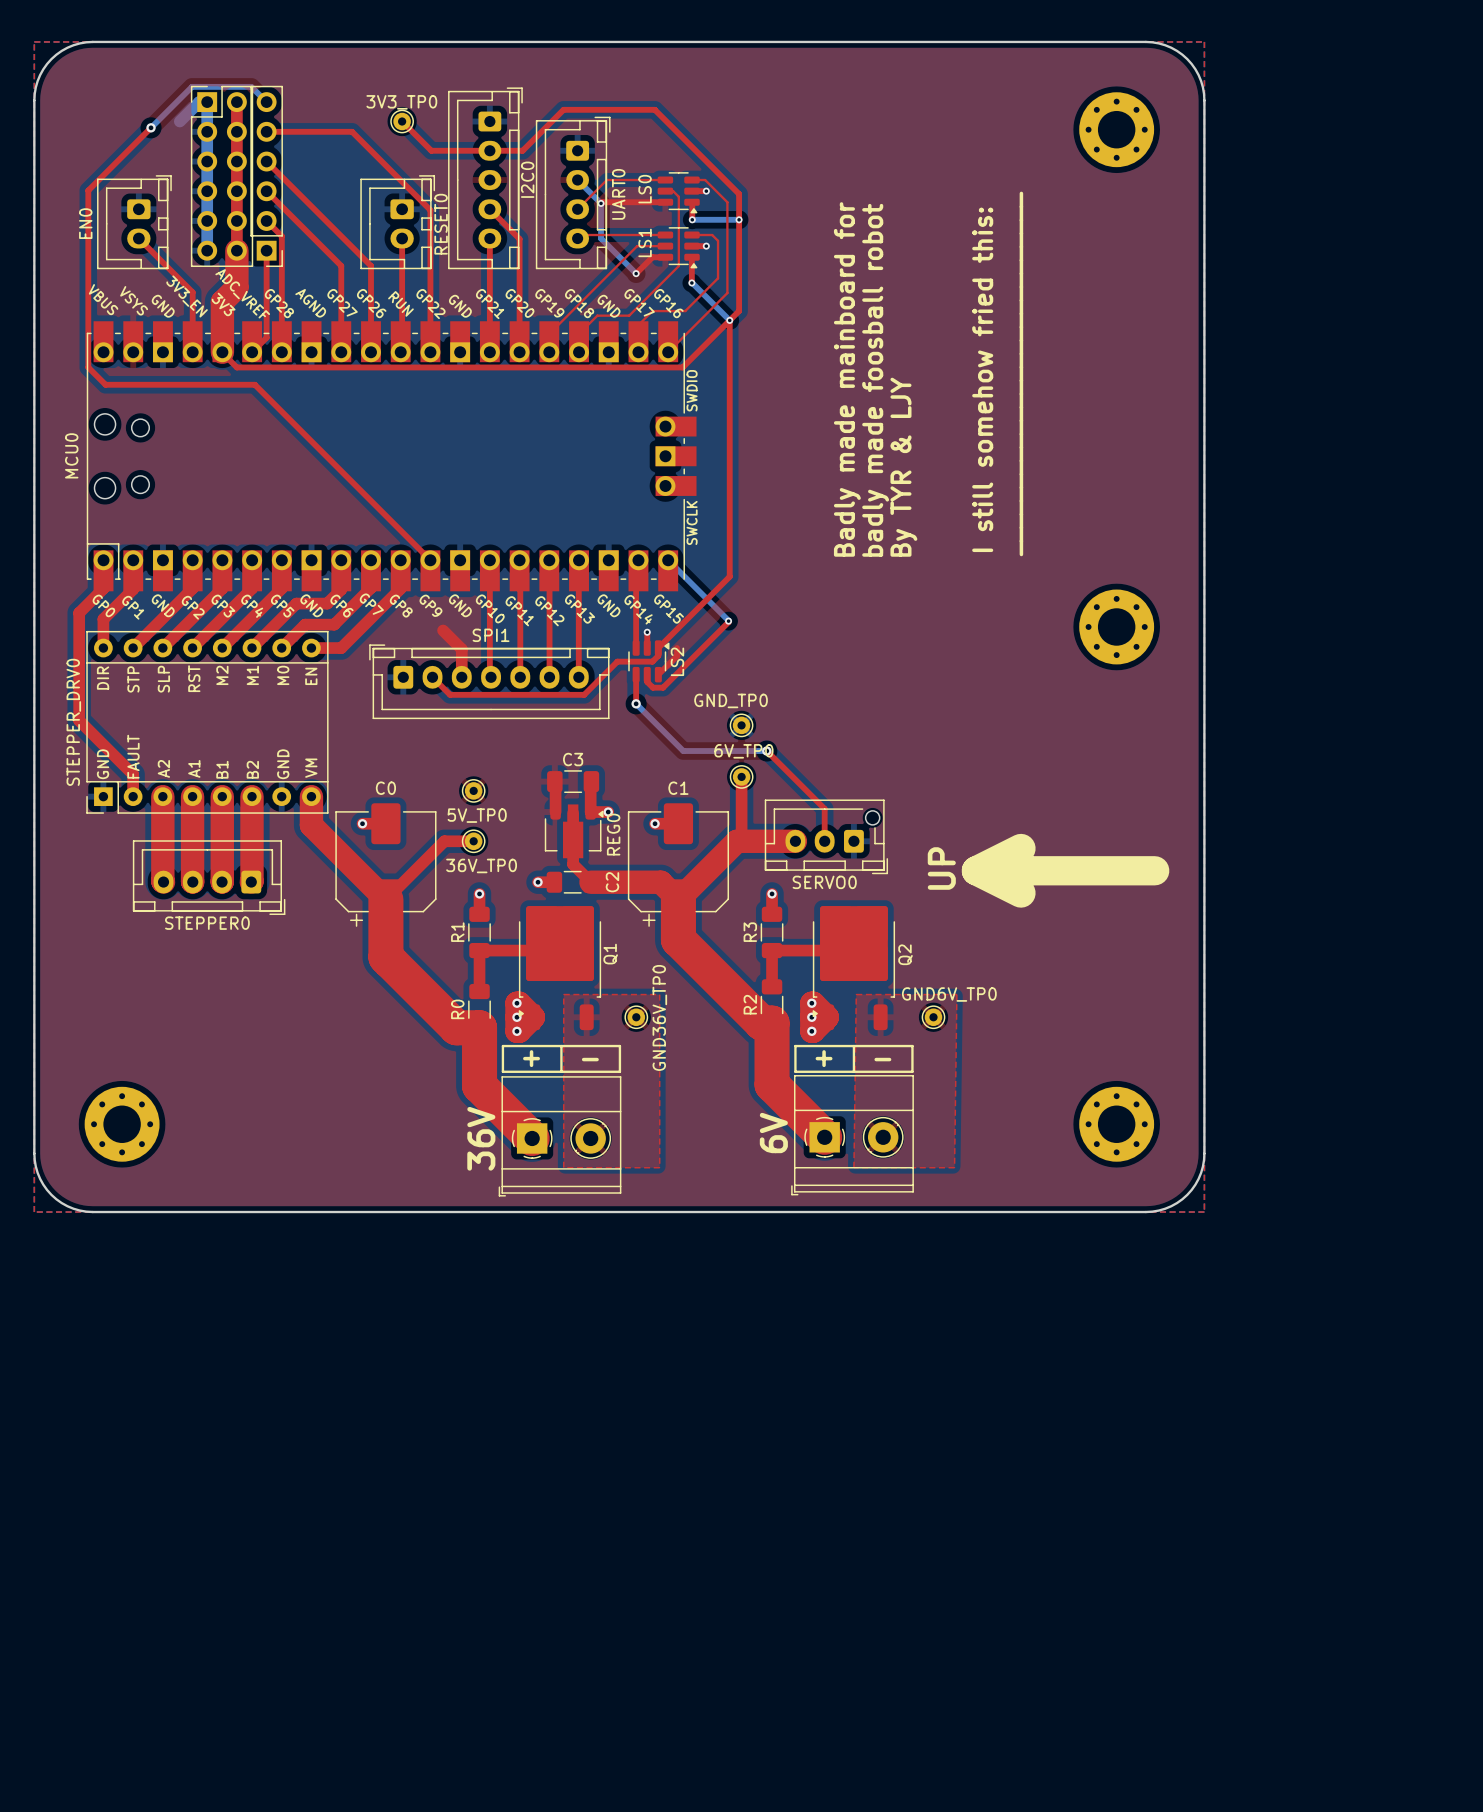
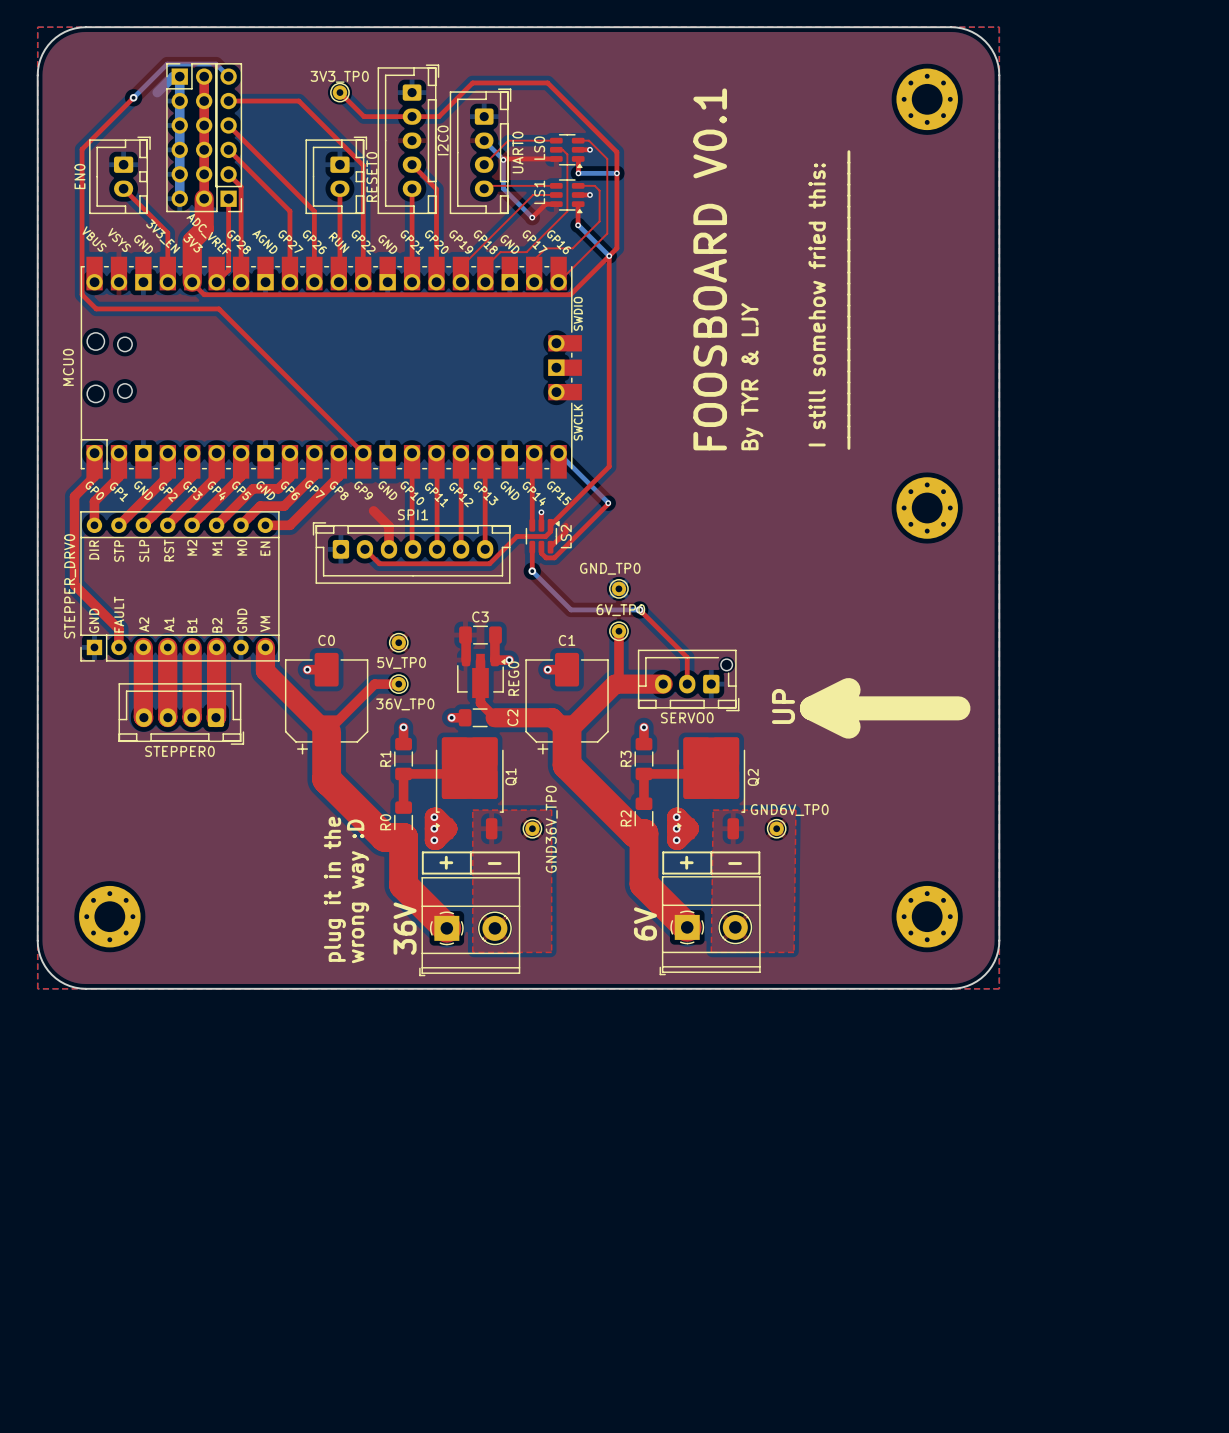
text: none -> FOOSBOARD V0.1 (710, 269)
text: Badly made mainboard for (847, 379) -> none
text: badly made foosball robot (875, 380) -> none
text: none -> plug it in the (334, 889)
text: none -> wrong way :D (358, 891)

